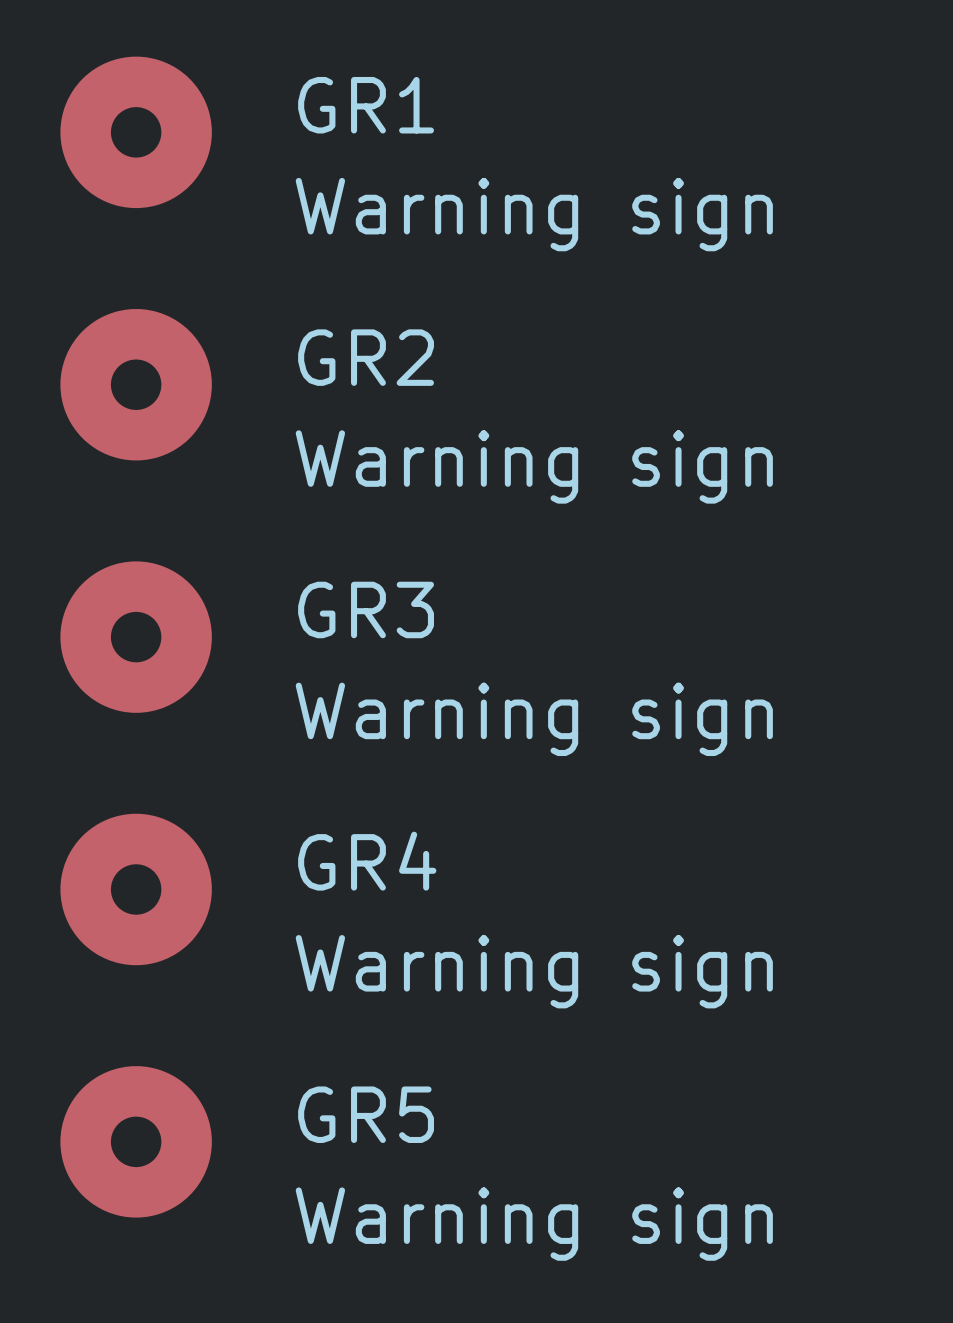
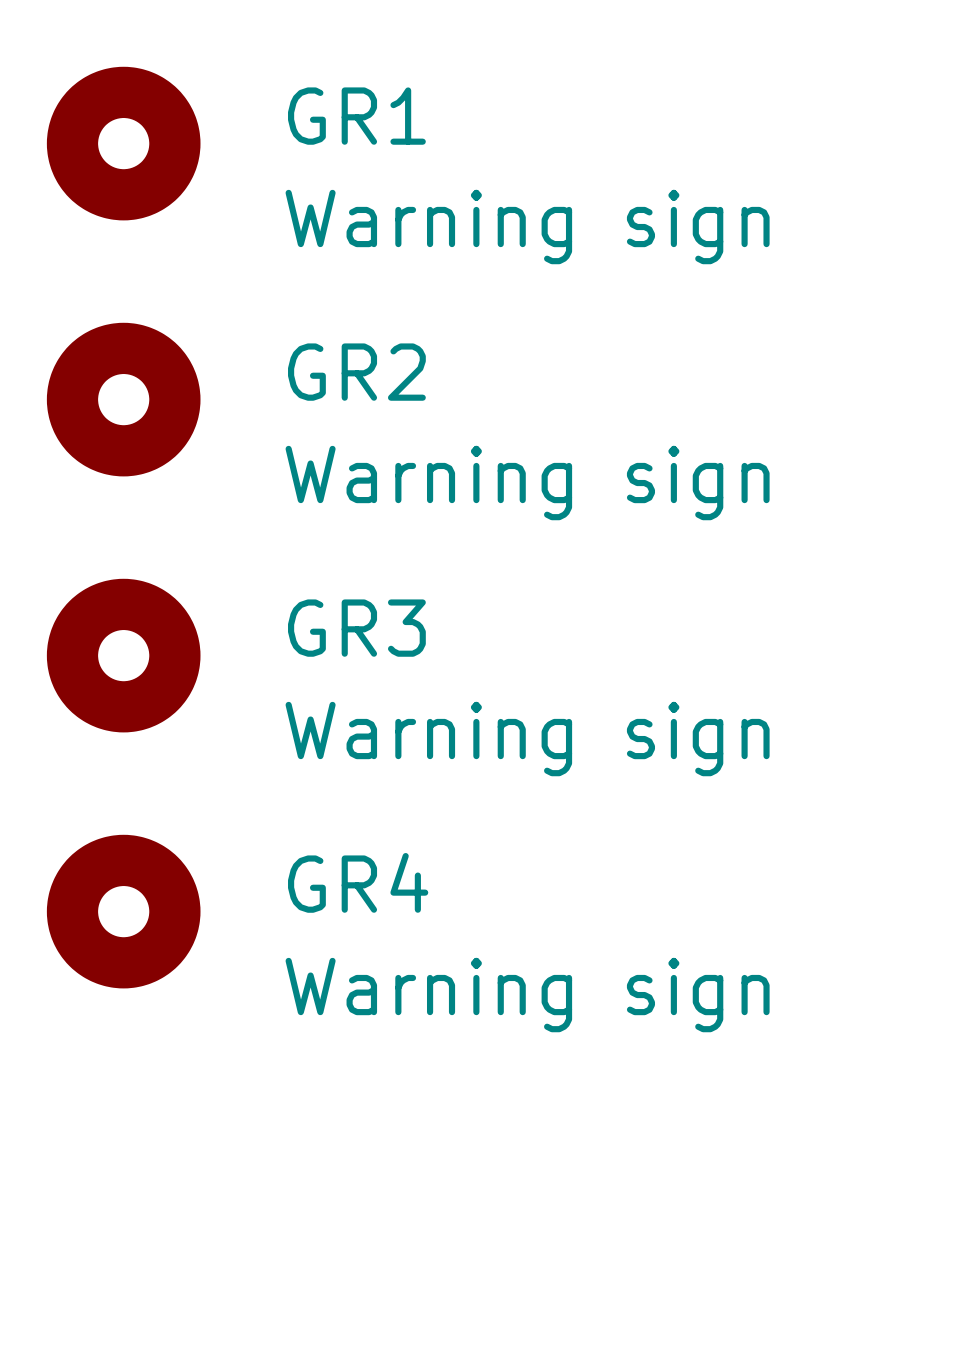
GR5: Warning sign (136, 1141) -> none

